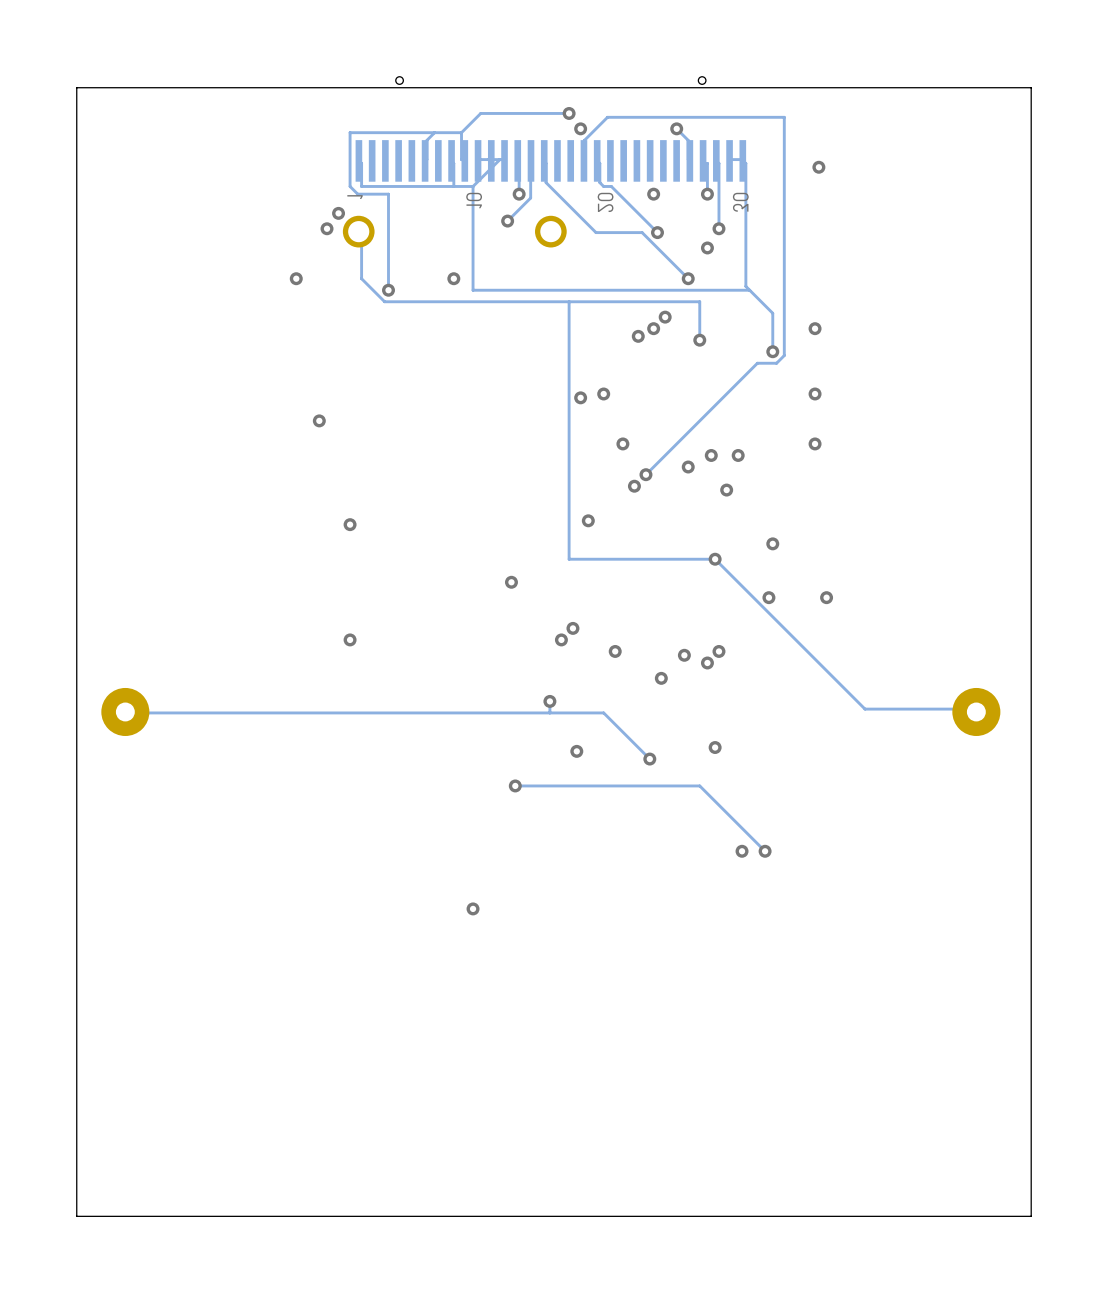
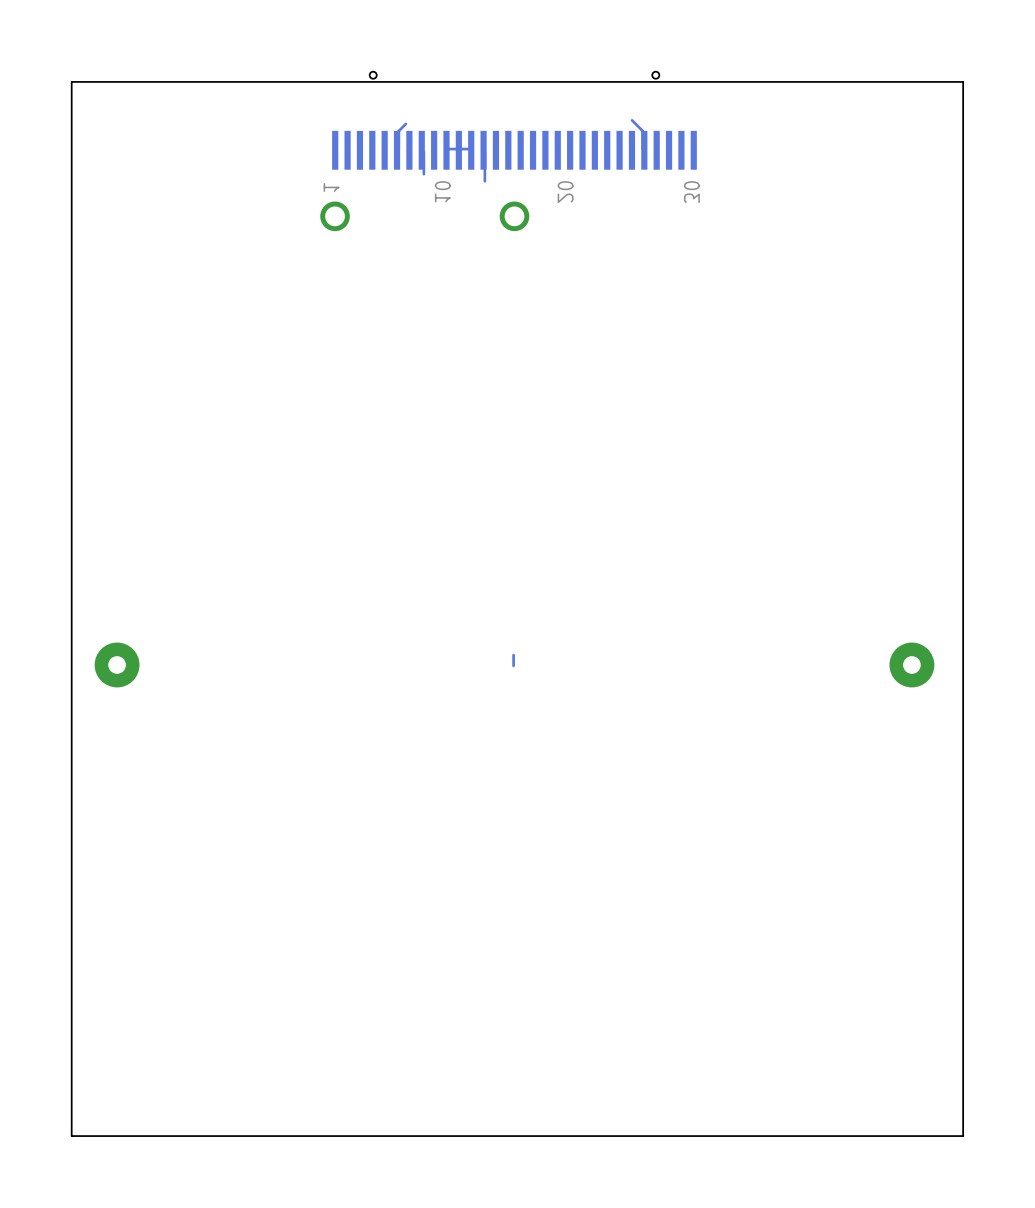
track: (569, 113) (480, 113) (461, 132) -> none
via: (569, 113) -> none
via: (580, 128) -> none
via: (676, 128) -> none
track: (461, 132) (461, 159) (464, 160) -> none
track: (461, 132) (350, 132) (350, 186) (357, 194) (388, 194) (388, 290) -> none
track: (499, 159) (473, 186) -> none
track: (358, 160) (361, 163) (361, 186) (473, 186) -> none
track: (531, 160) (530, 198) (507, 221) -> none
track: (544, 160) (546, 163) (546, 182) (596, 232) (642, 232) (688, 278) -> none
track: (583, 160) (584, 140) (607, 117) (784, 117) (784, 355) (776, 363) (757, 363) (645, 474) -> none
track: (597, 160) (599, 163) (599, 182) (603, 186) (611, 186) (657, 232) -> none
track: (703, 160) (703, 163) (707, 163) (707, 194) -> none
track: (716, 160) (718, 163) (718, 228) -> none
track: (729, 160) (742, 159) (745, 163) (745, 286) (772, 313) (772, 351) -> none
via: (818, 167) -> none
track: (473, 186) (473, 290) (749, 290) -> none
via: (519, 194) -> none
via: (653, 194) -> none
via: (707, 194) -> none
via: (338, 213) -> none
via: (507, 221) -> none
via: (327, 228) -> none
via: (718, 228) -> none
track: (358, 231) (361, 232) (361, 278) (384, 301) (699, 301) (699, 340) -> none
via: (657, 232) -> none
via: (707, 247) -> none
via: (296, 278) -> none
via: (453, 278) -> none
via: (688, 278) -> none
via: (388, 290) -> none
track: (569, 301) (569, 559) (715, 559) (865, 709) (972, 709) (976, 711) -> none
via: (665, 317) -> none
via: (653, 328) -> none
via: (815, 328) -> none
via: (638, 336) -> none
via: (699, 340) -> none
via: (772, 351) -> none
via: (603, 393) -> none
via: (815, 393) -> none
via: (580, 397) -> none
via: (319, 420) -> none
via: (622, 443) -> none
via: (815, 443) -> none
via: (711, 455) -> none
via: (738, 455) -> none
via: (688, 467) -> none
via: (645, 474) -> none
via: (634, 486) -> none
via: (726, 490) -> none
via: (588, 520) -> none
via: (350, 524) -> none
via: (772, 543) -> none
via: (715, 559) -> none
via: (511, 582) -> none
via: (768, 597) -> none
via: (826, 597) -> none
via: (572, 628) -> none
via: (350, 639) -> none
via: (561, 639) -> none
via: (615, 651) -> none
via: (718, 651) -> none
via: (684, 655) -> none
via: (707, 662) -> none
via: (661, 678) -> none
via: (549, 701) -> none
track: (125, 711) (603, 712) (649, 759) -> none
via: (715, 747) -> none
via: (576, 751) -> none
via: (649, 759) -> none
track: (515, 785) (699, 785) (765, 851) -> none
via: (515, 785) -> none
via: (742, 851) -> none
via: (765, 851) -> none
via: (473, 908) -> none

